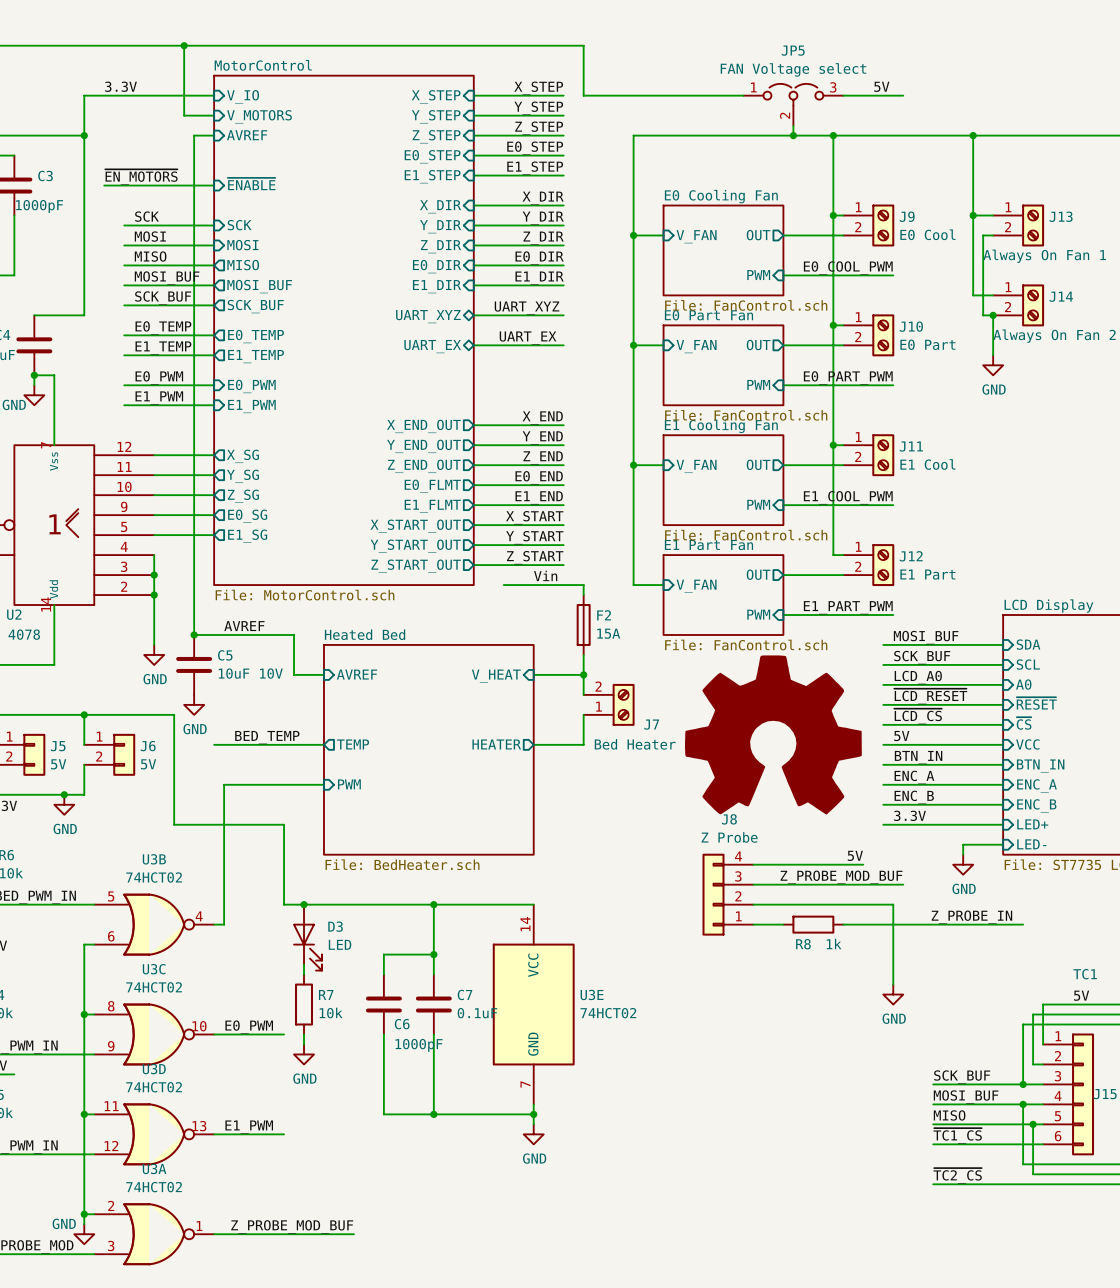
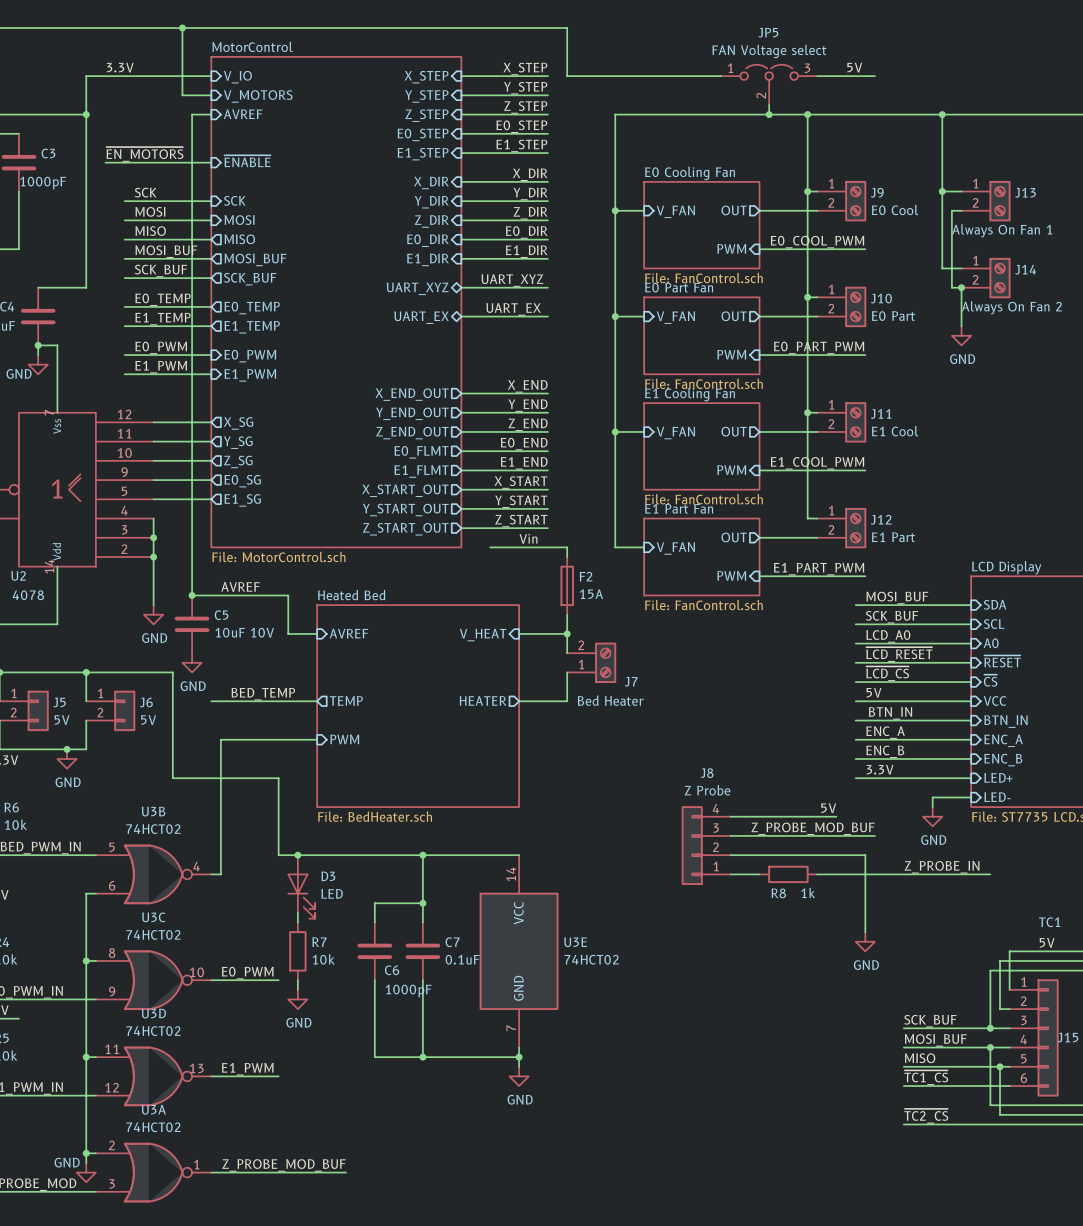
part: (773, 734) -> none

